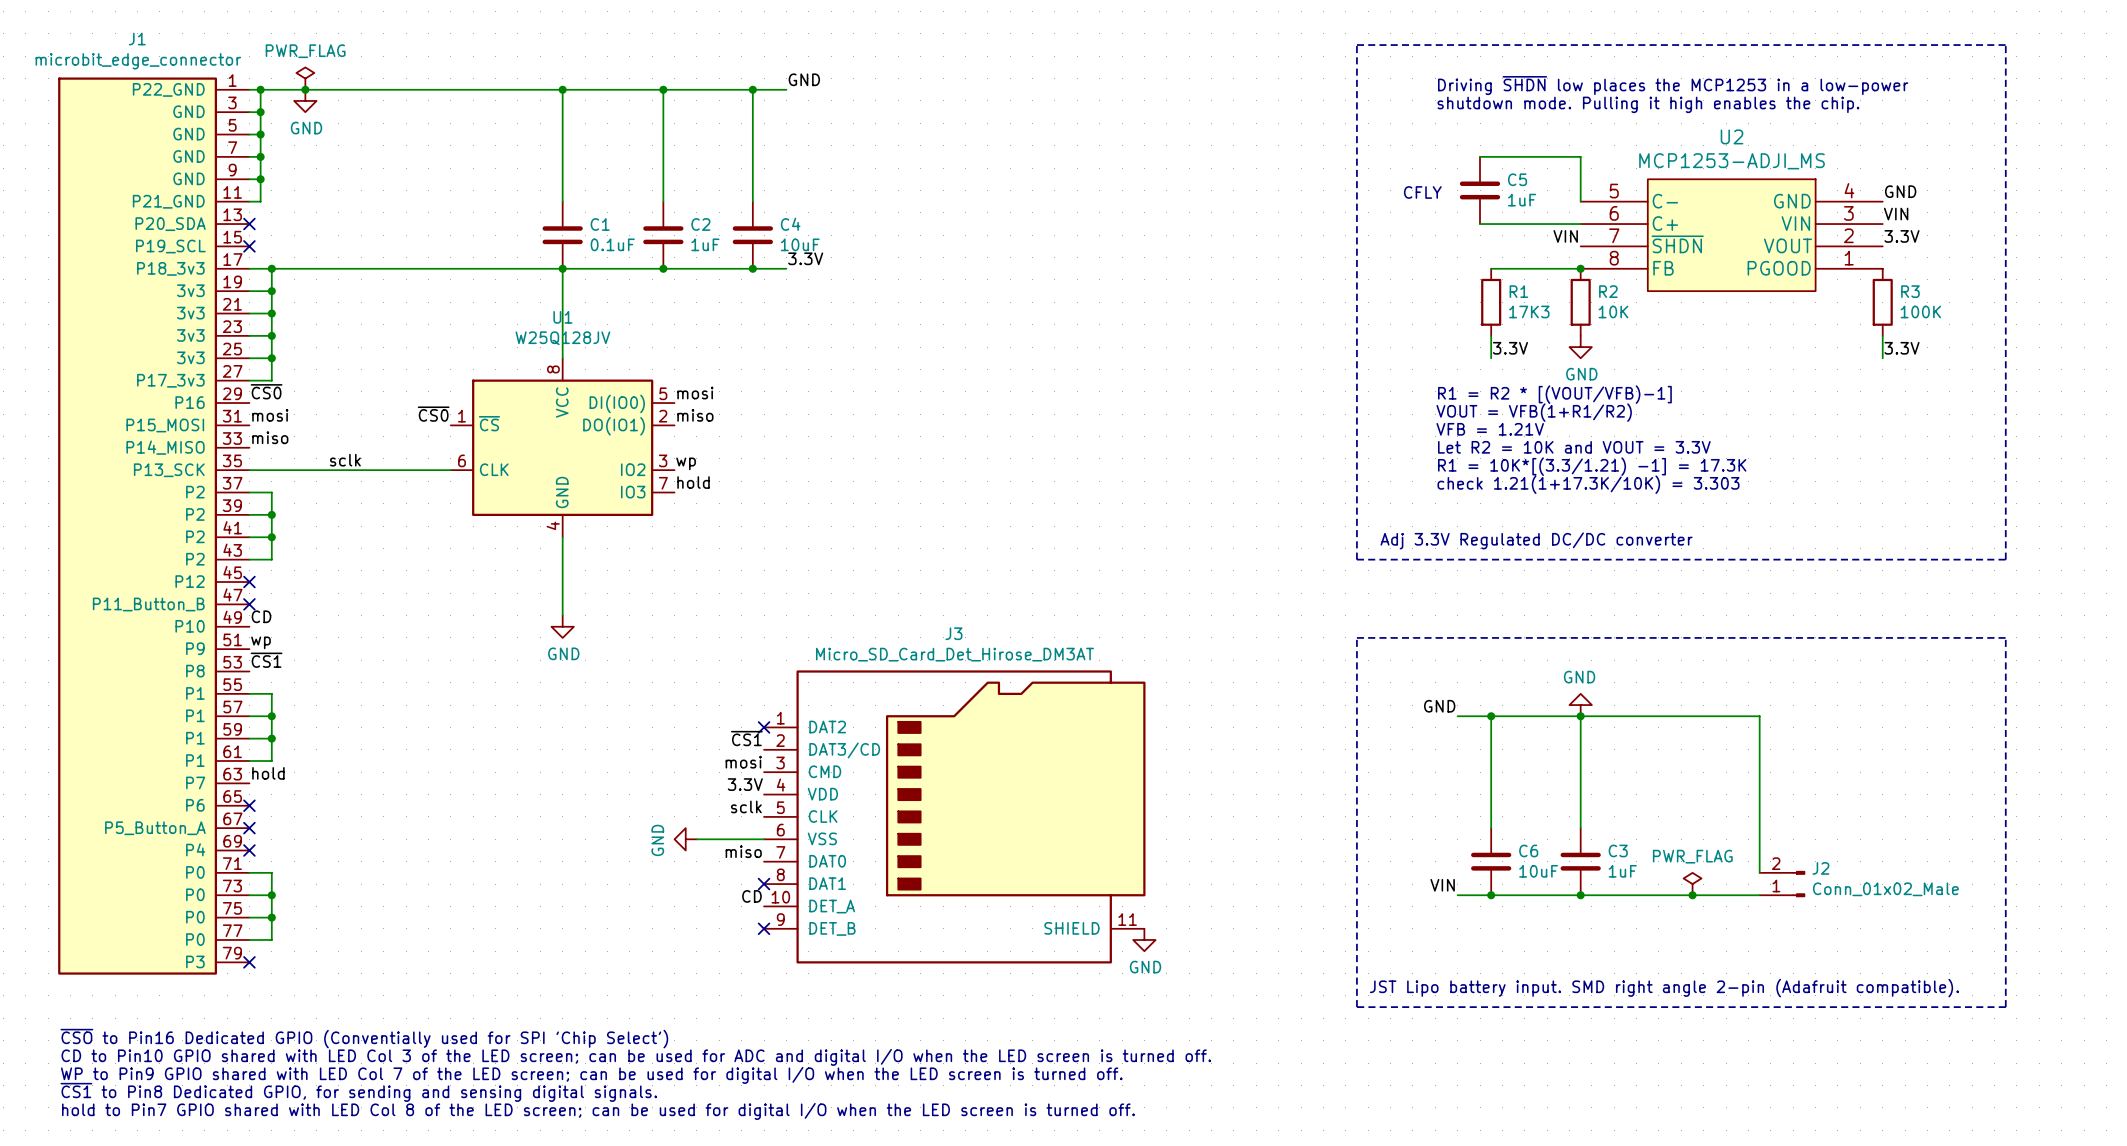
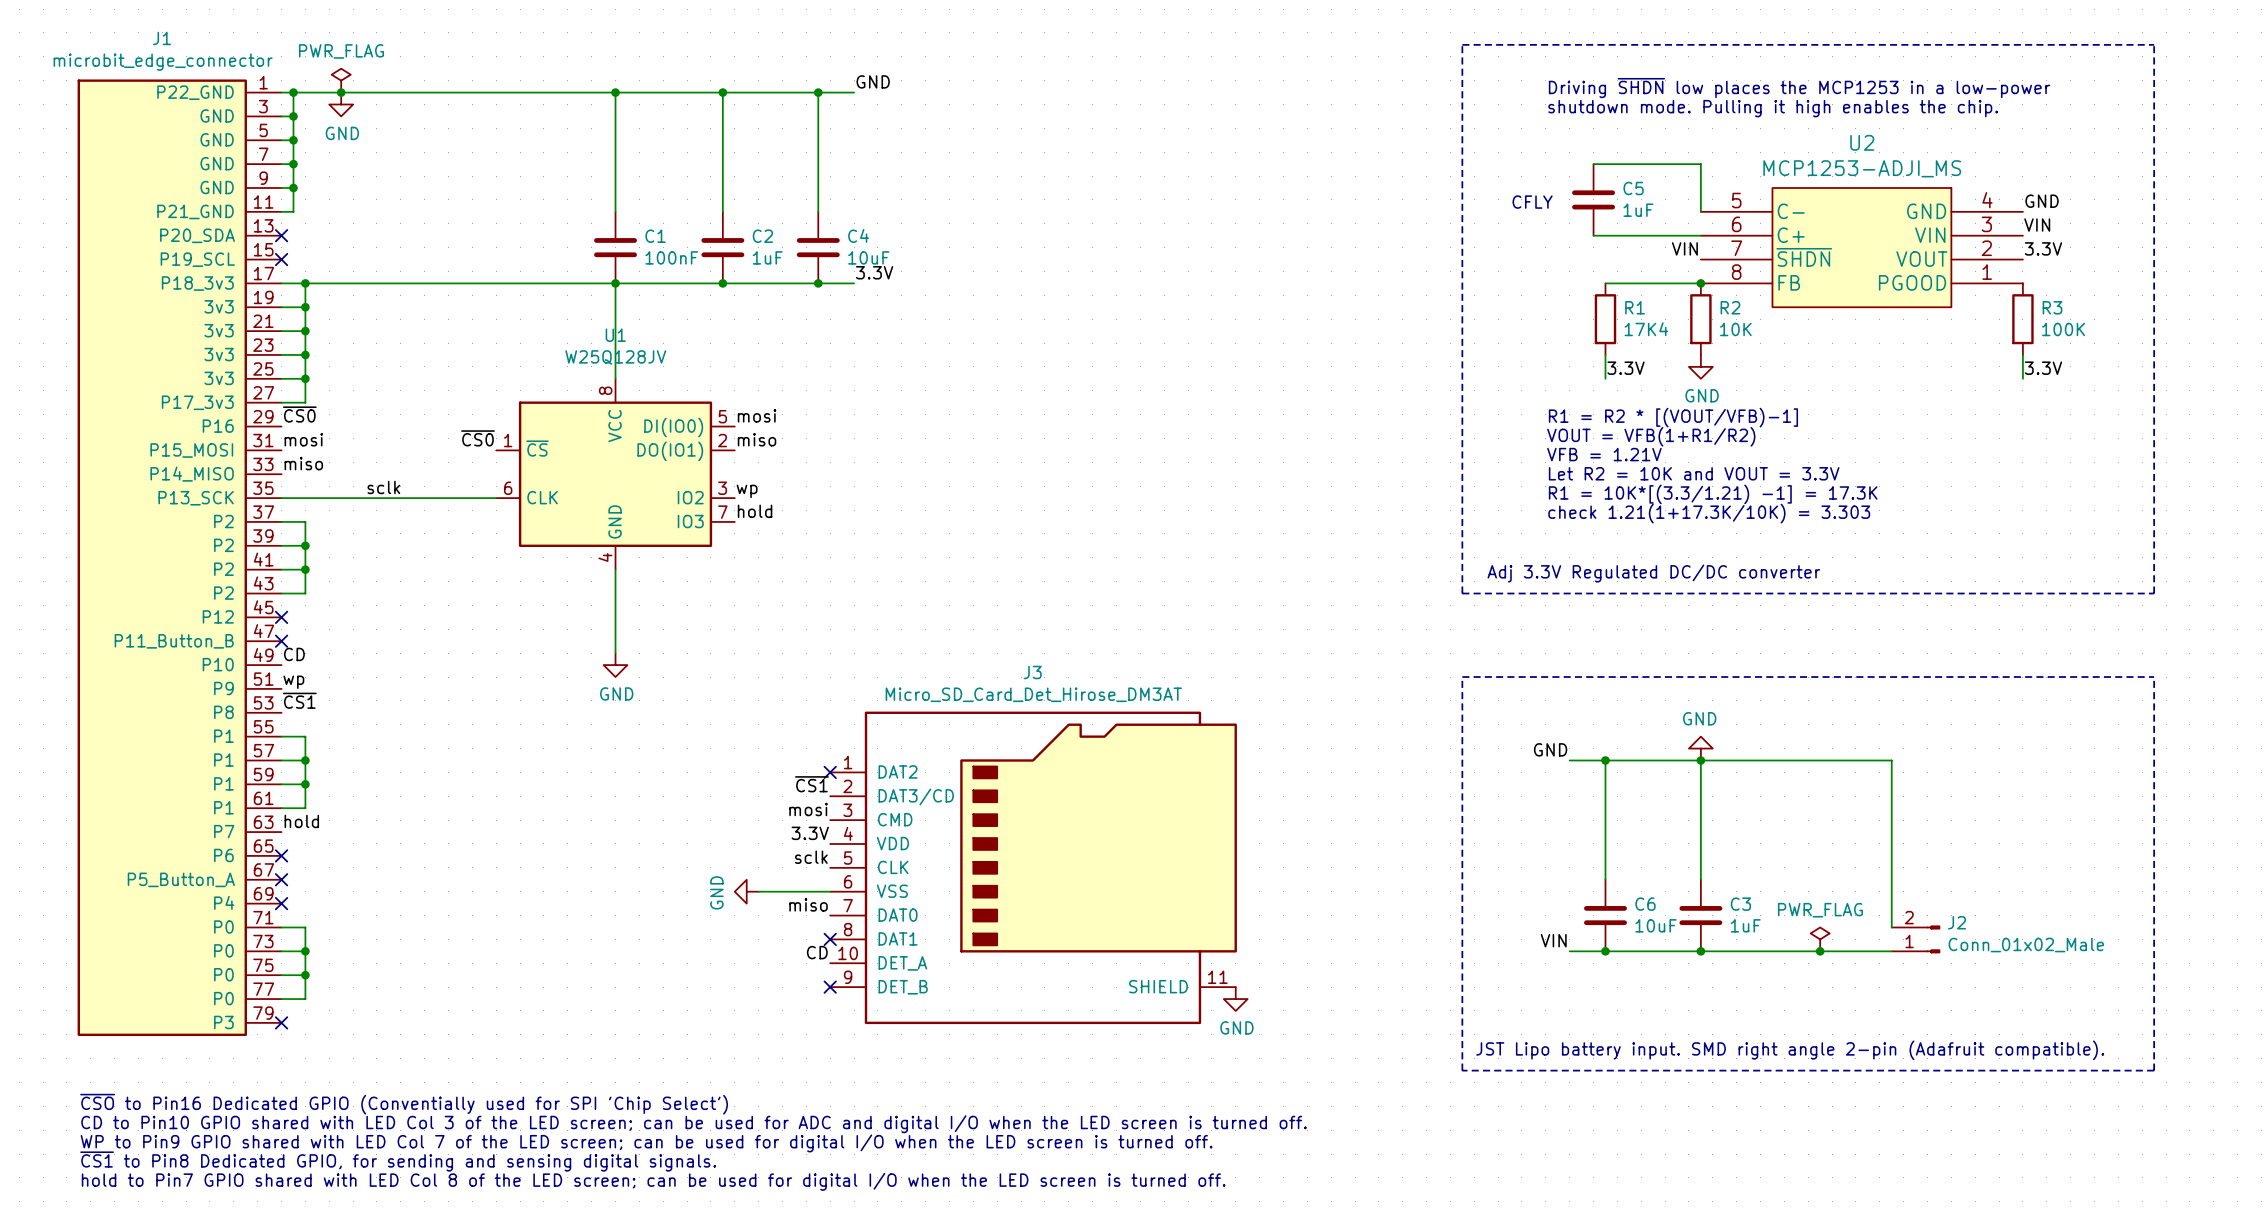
C1 value: 0.1uF (612, 244) -> 100nF (671, 257)
R1 value: 17K3 (1529, 311) -> 17K4 (1646, 329)

